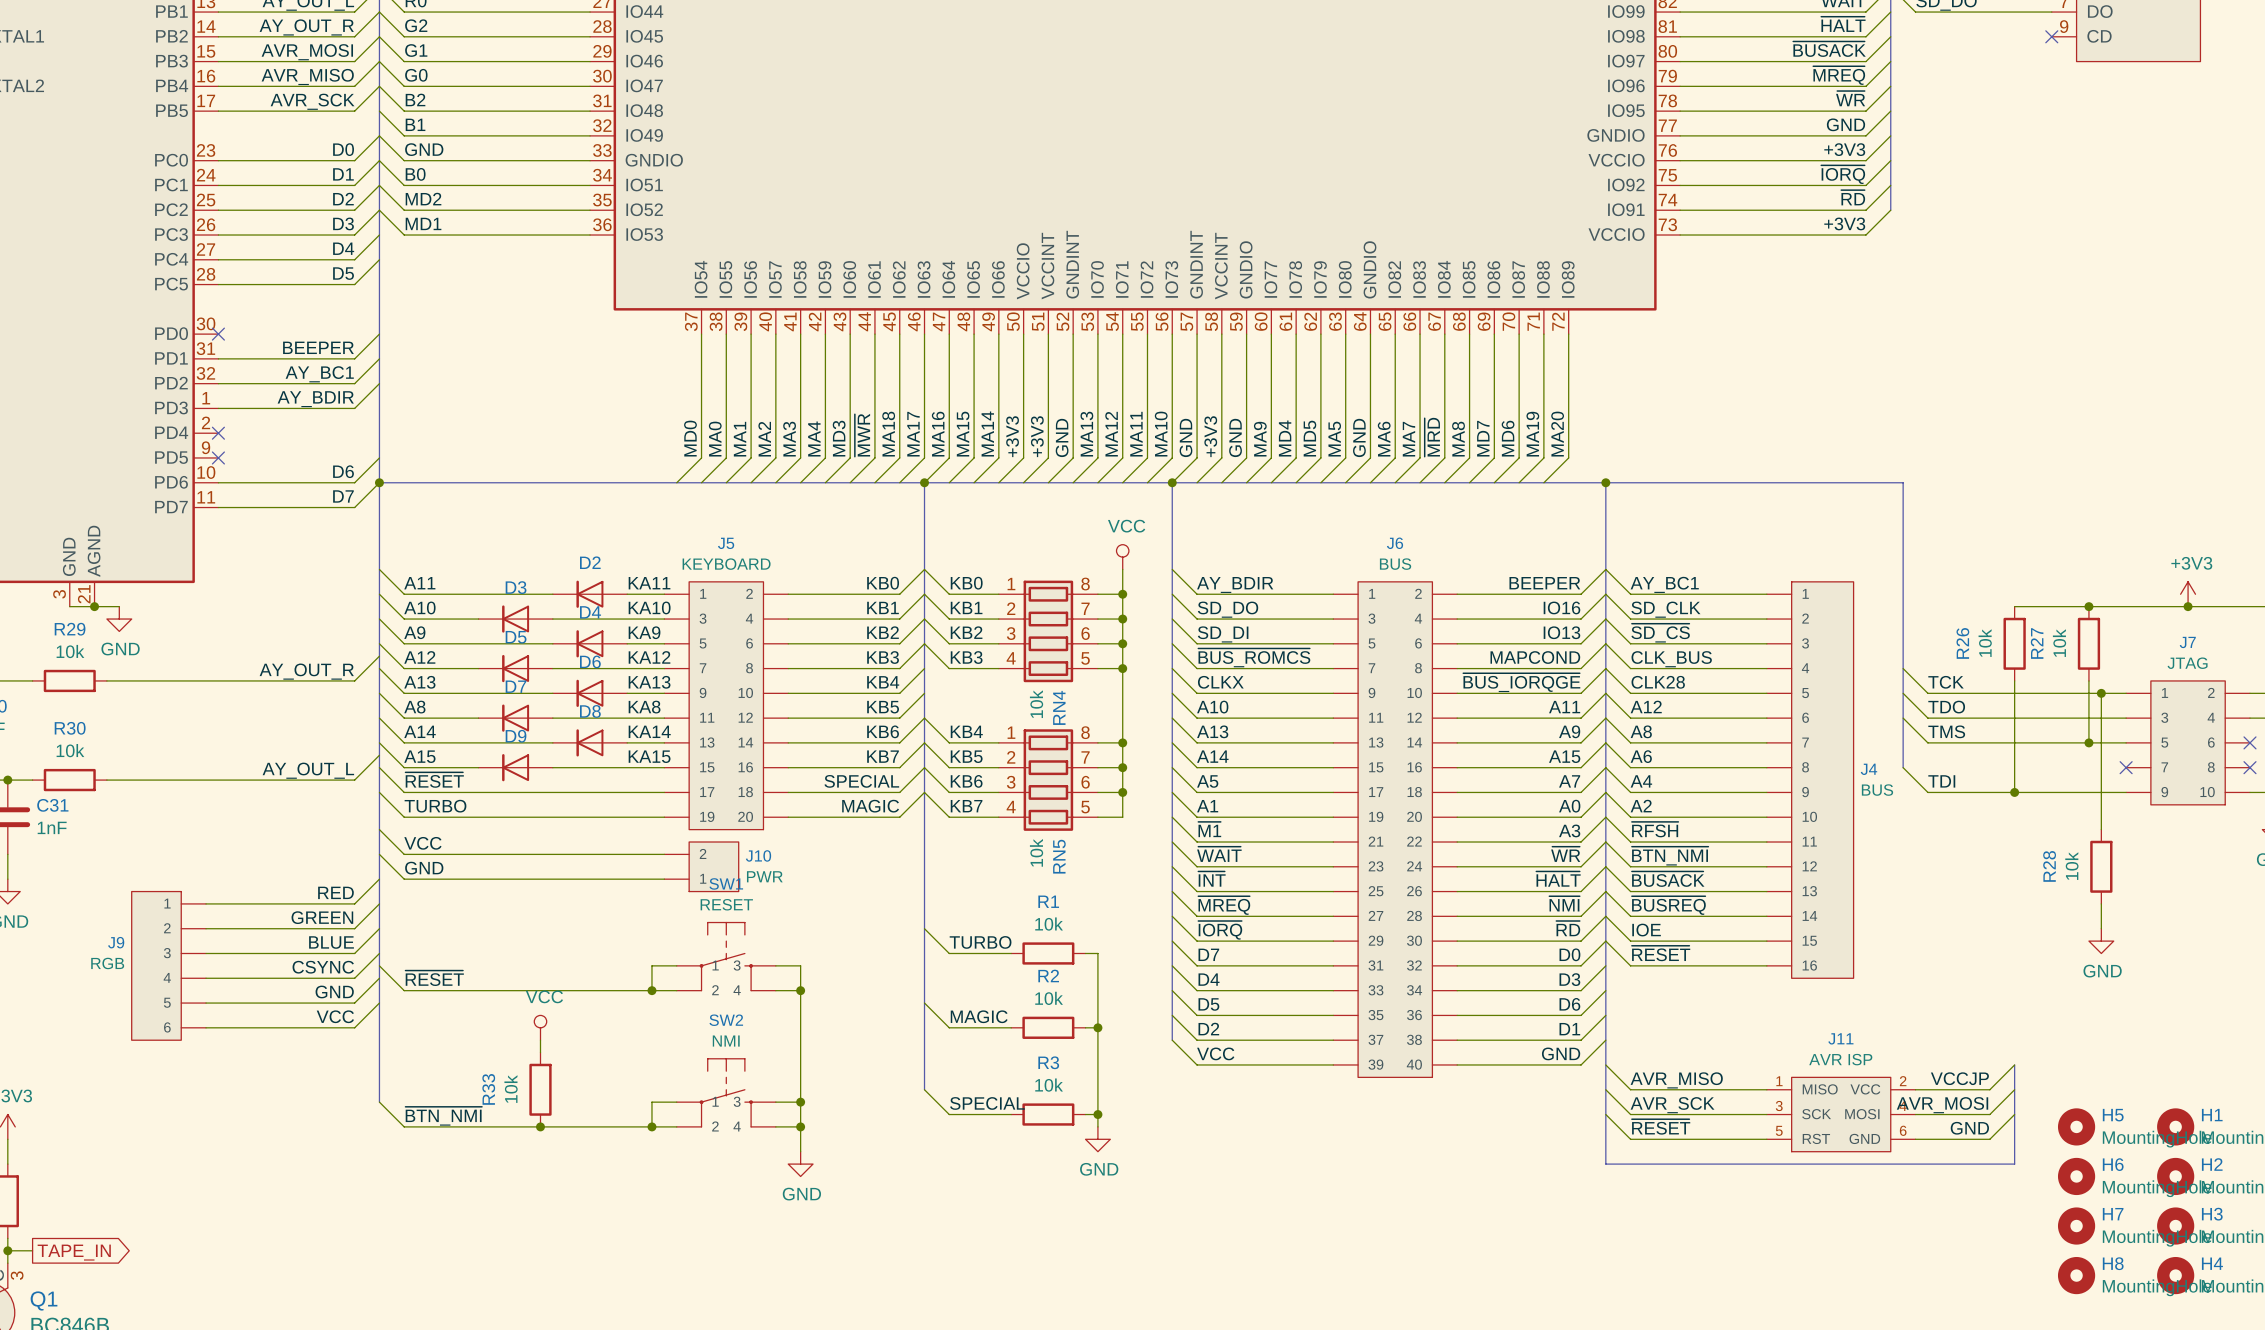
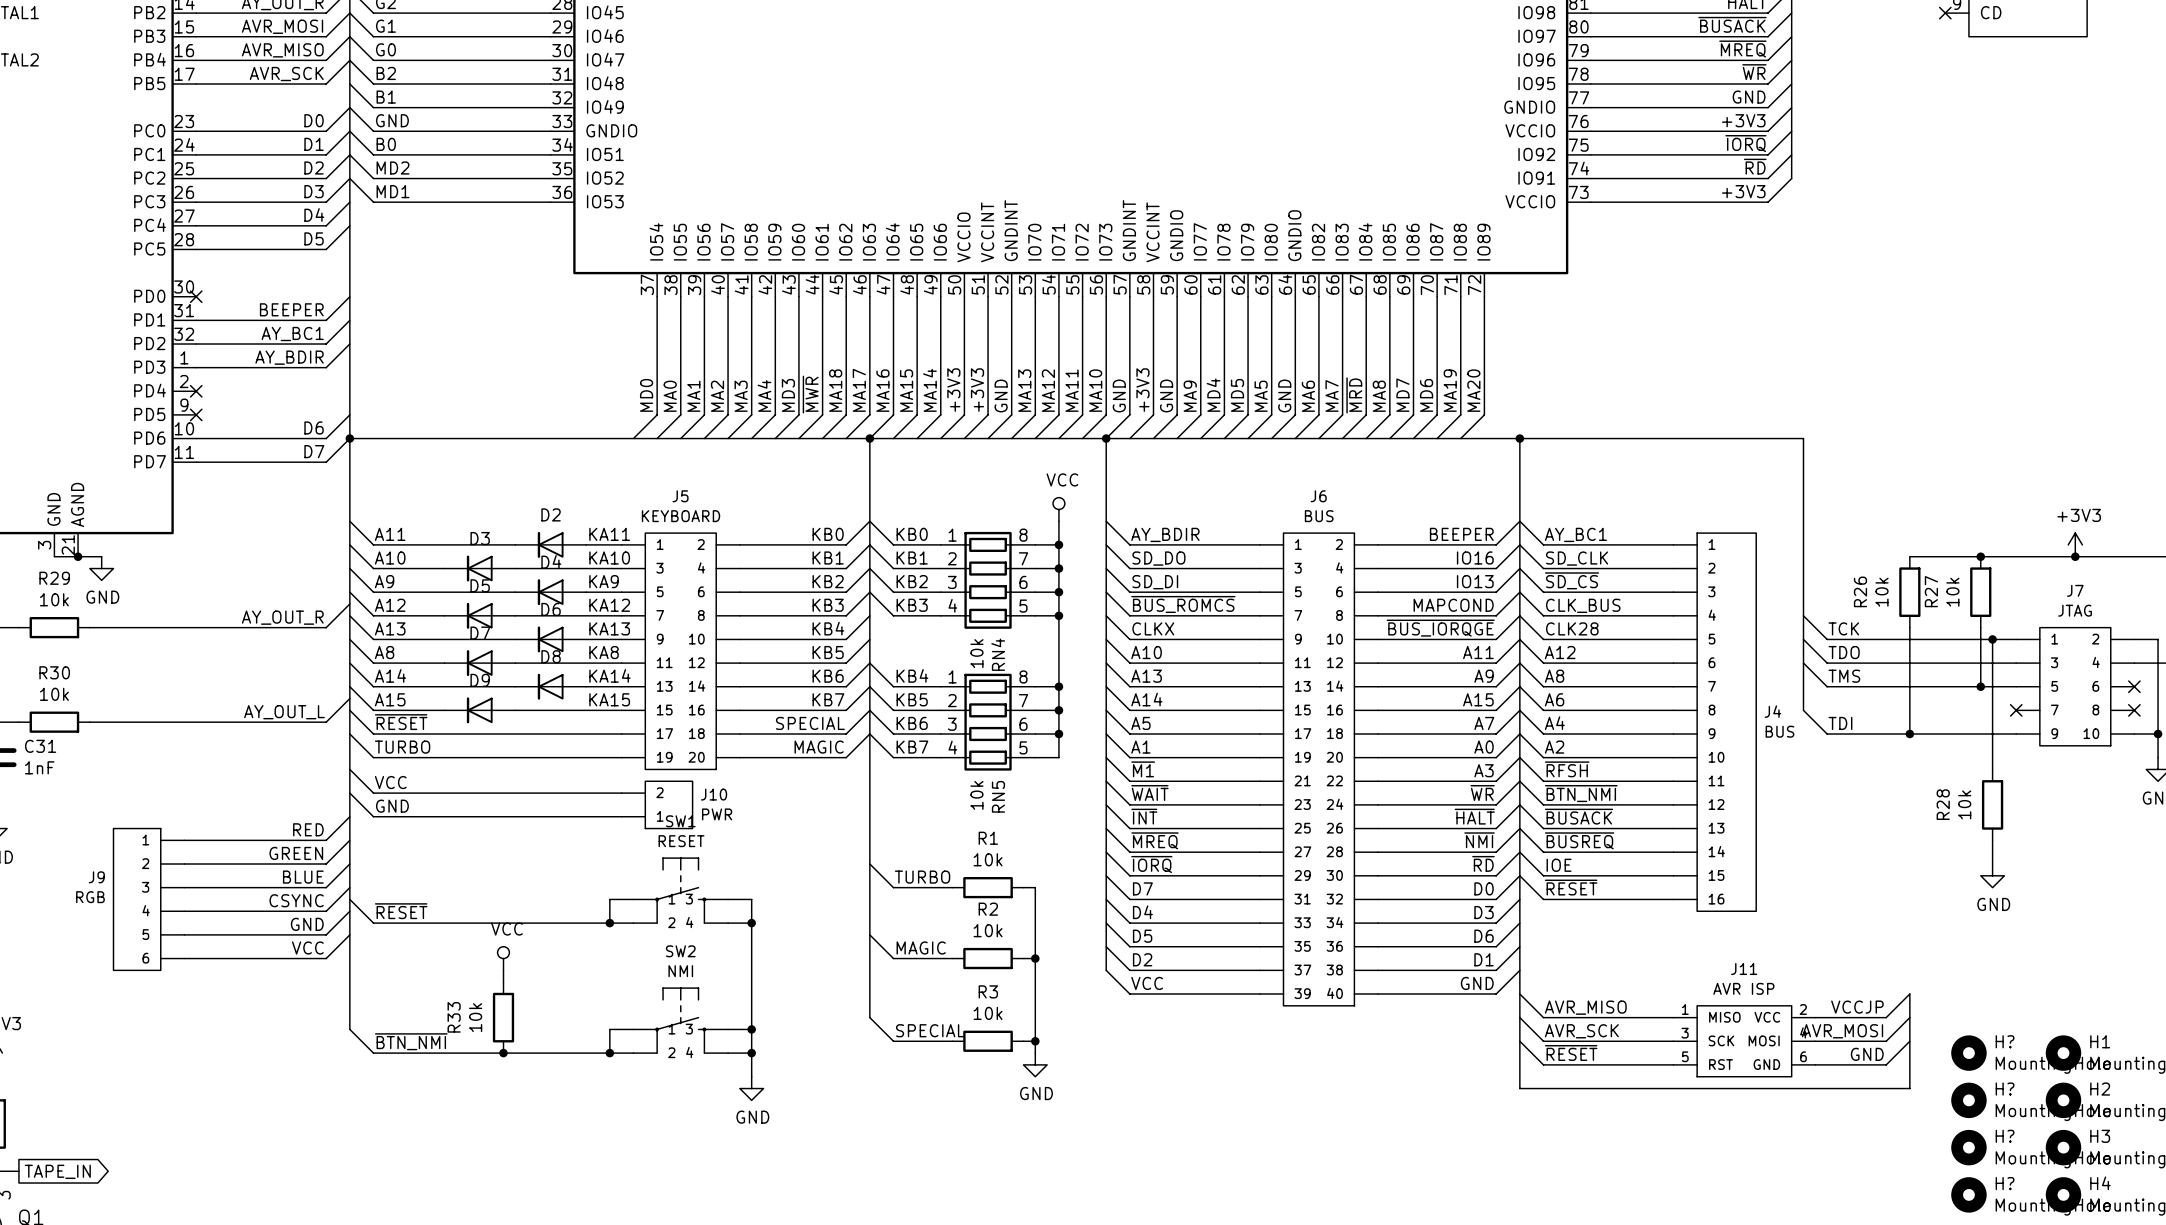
H5 name: H5 (2113, 1115) -> H? (2005, 1041)
H6 name: H6 (2113, 1164) -> H? (2005, 1089)
H7 name: H7 (2113, 1214) -> H? (2005, 1136)
H8 name: H8 (2113, 1263) -> H? (2005, 1183)

